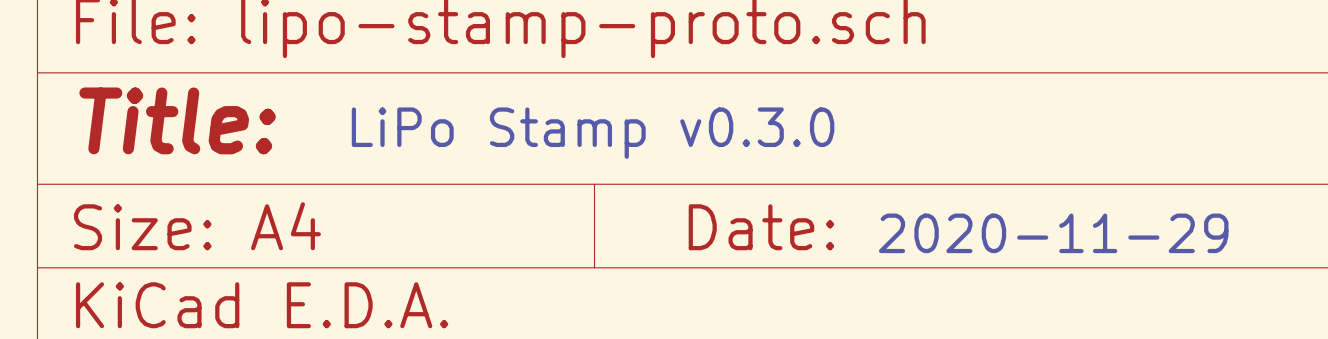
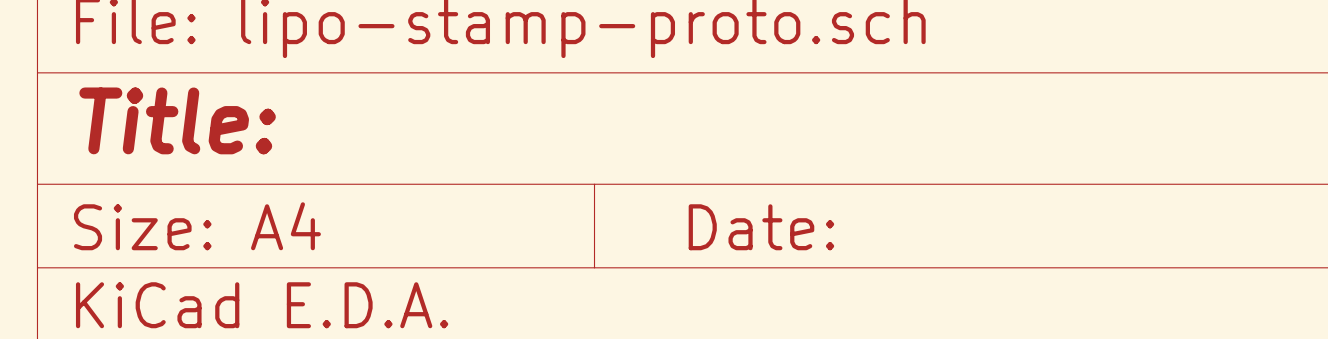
text: LiPo Stamp v0.3.0 (593, 133) -> none
text: 2020-11-29 (1053, 233) -> none

